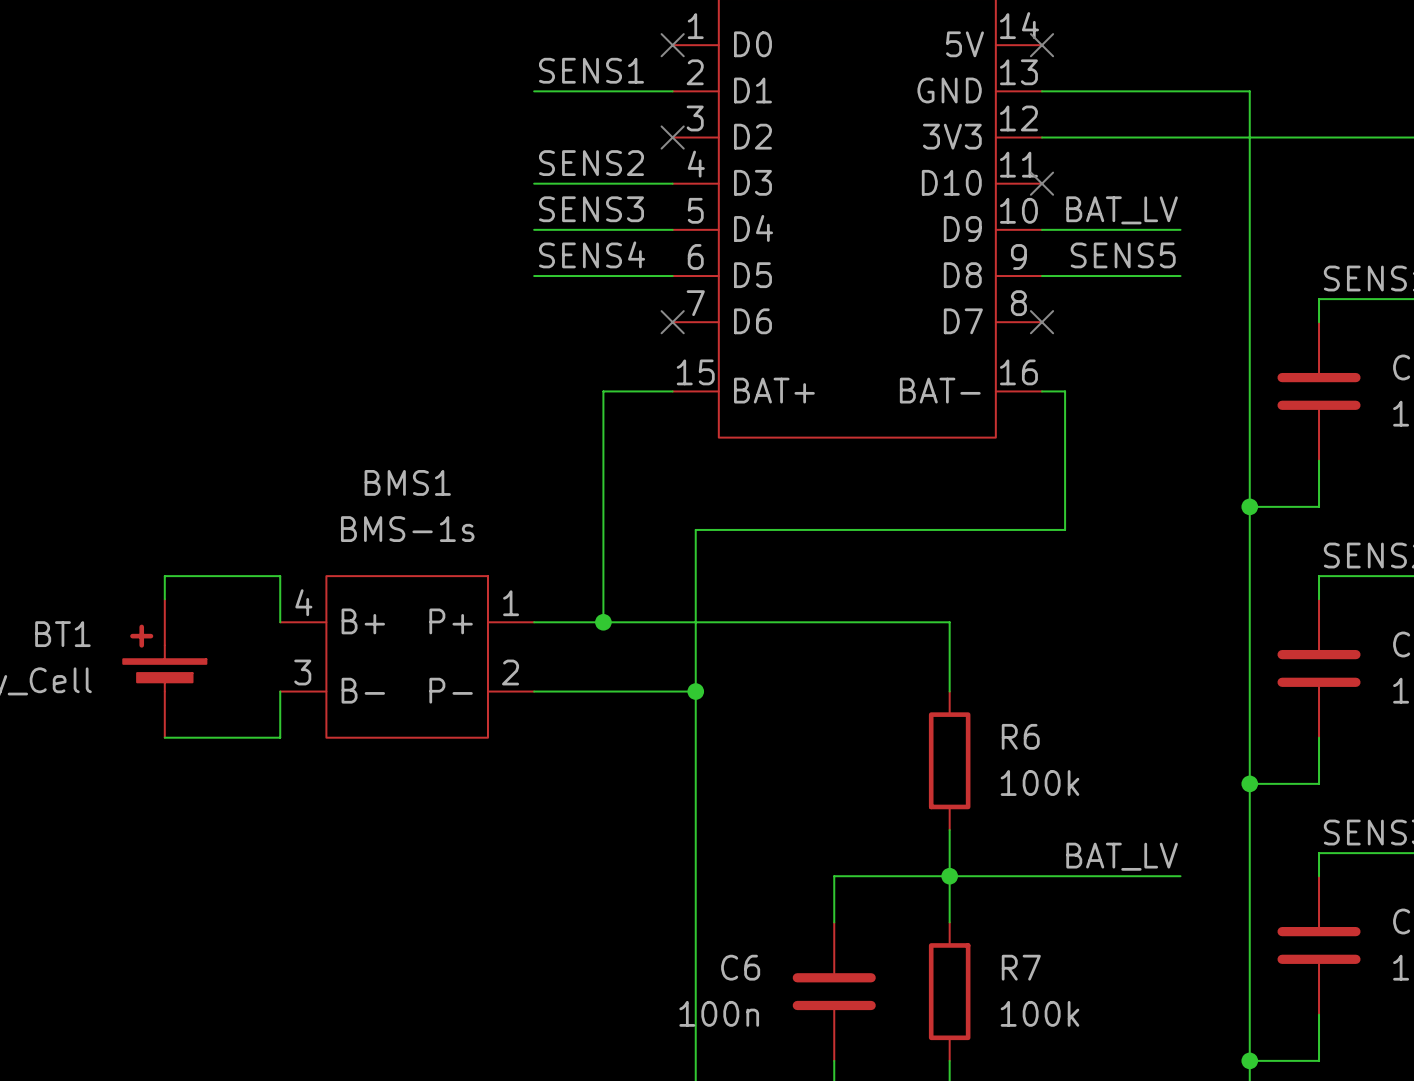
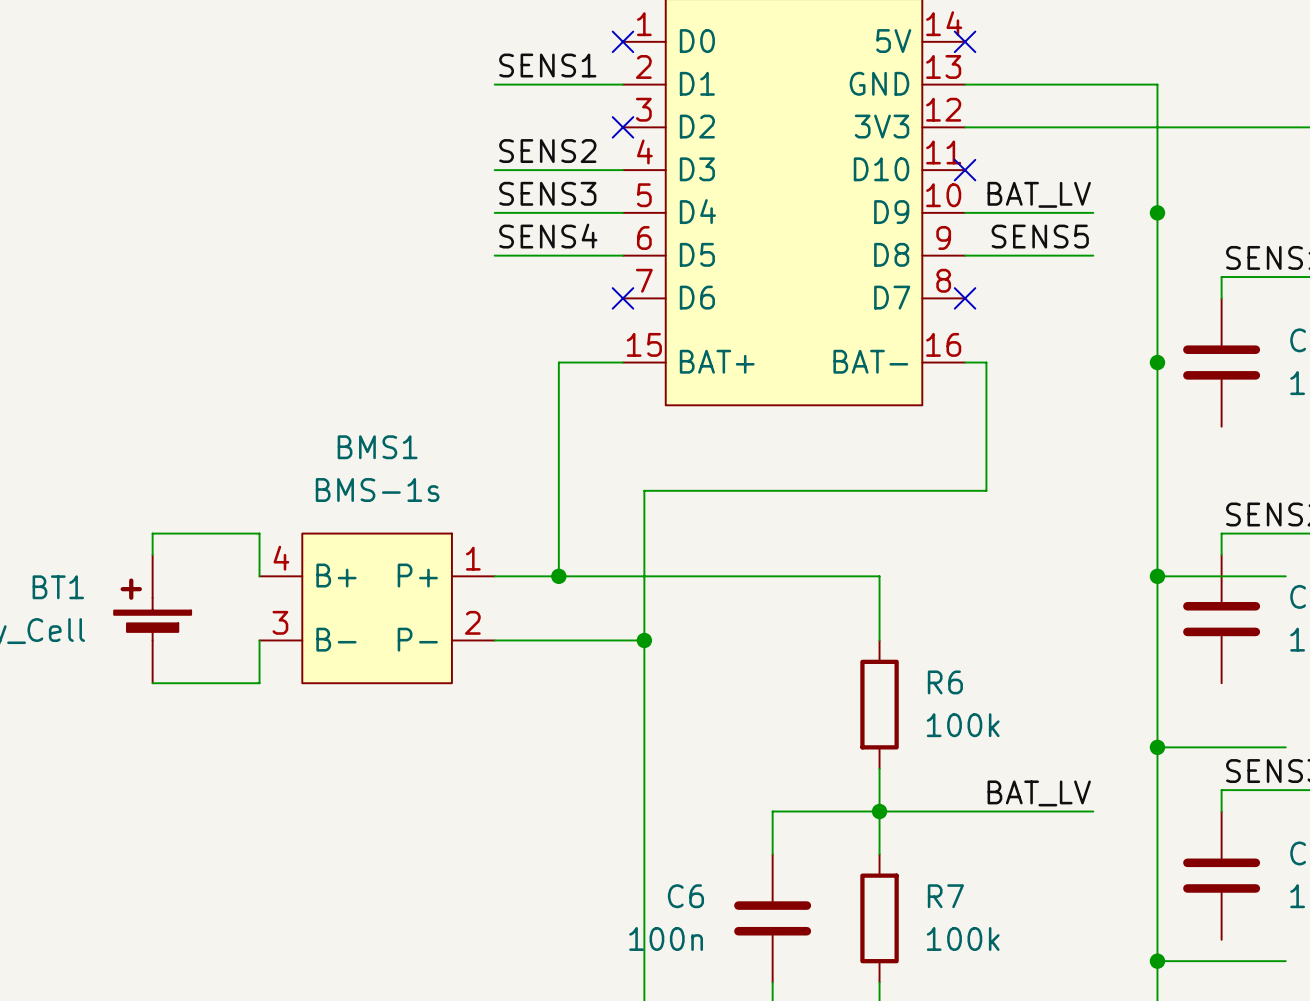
junction: none -> (1157, 212)
junction: none -> (1157, 362)
wire: (1319, 460) (1319, 506) (1249, 506) -> none
junction: (1249, 506) -> none
wire: none -> (1157, 576) (1285, 576)
junction: none -> (1157, 576)
wire: (1319, 737) (1319, 783) (1249, 783) -> none
junction position: (1249, 783) -> (1157, 747)
wire: none -> (1157, 747) (1285, 747)
wire: (1319, 1014) (1319, 1060) (1249, 1060) -> none
wire: none -> (1157, 961) (1285, 961)
junction position: (1249, 1060) -> (1157, 961)

